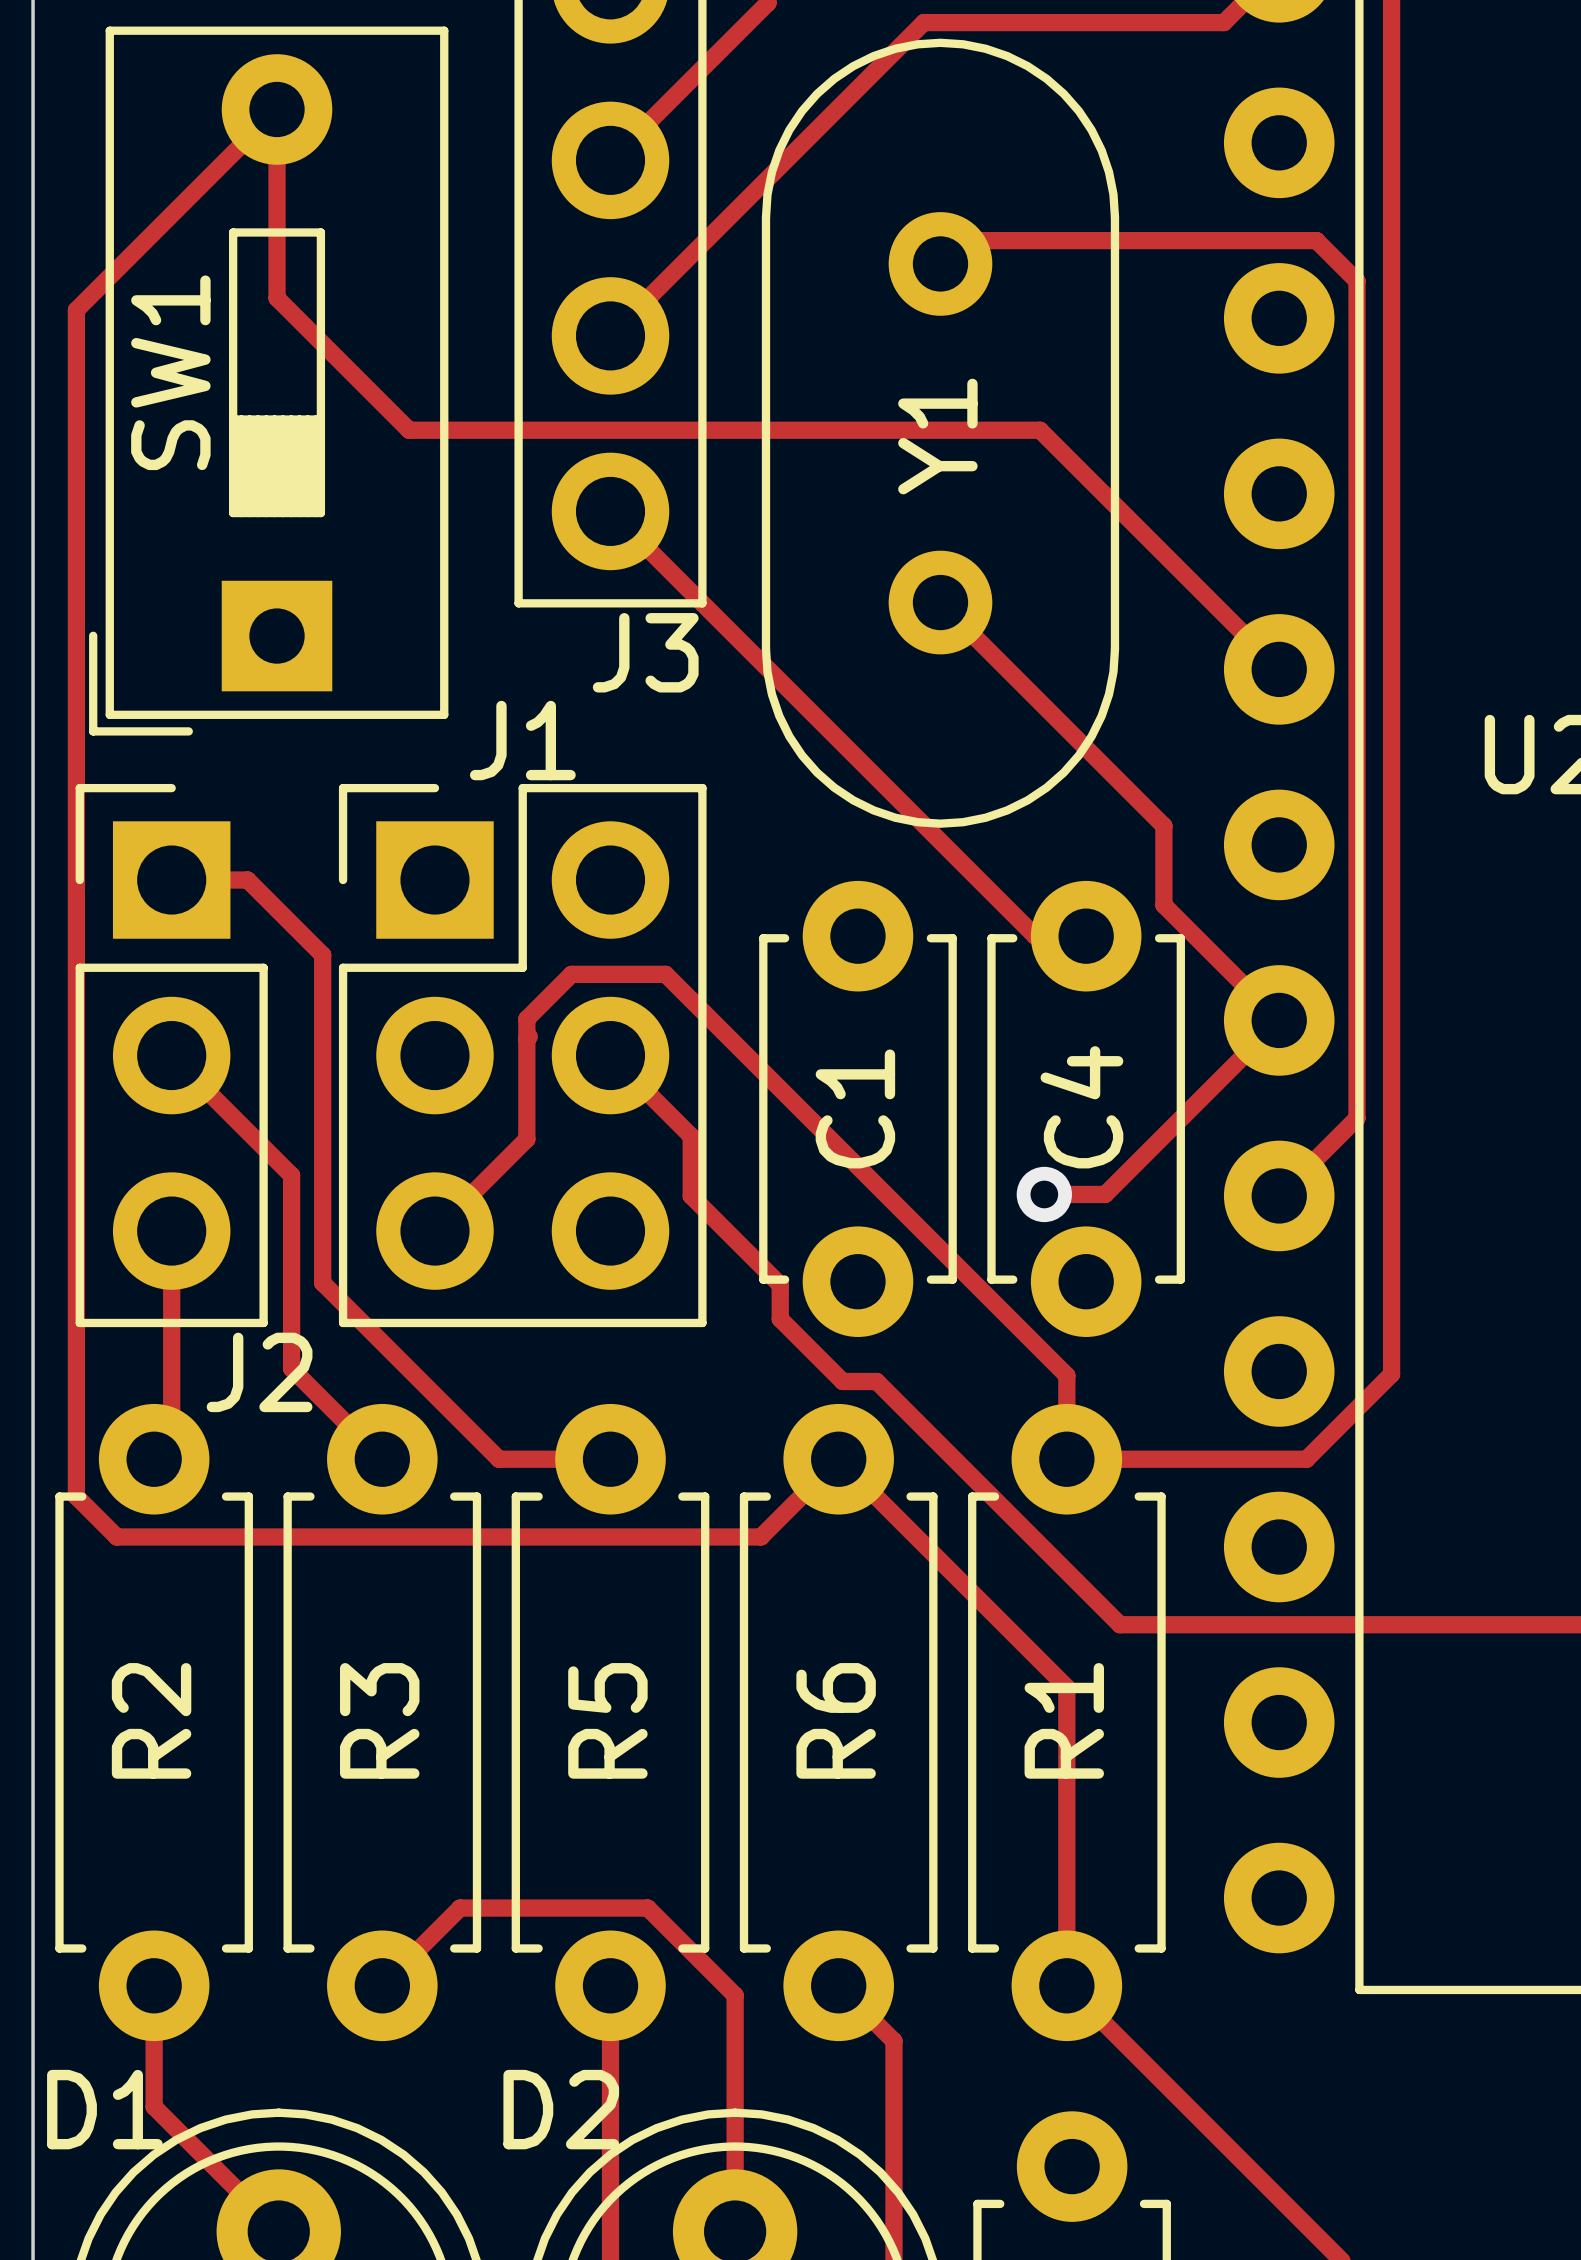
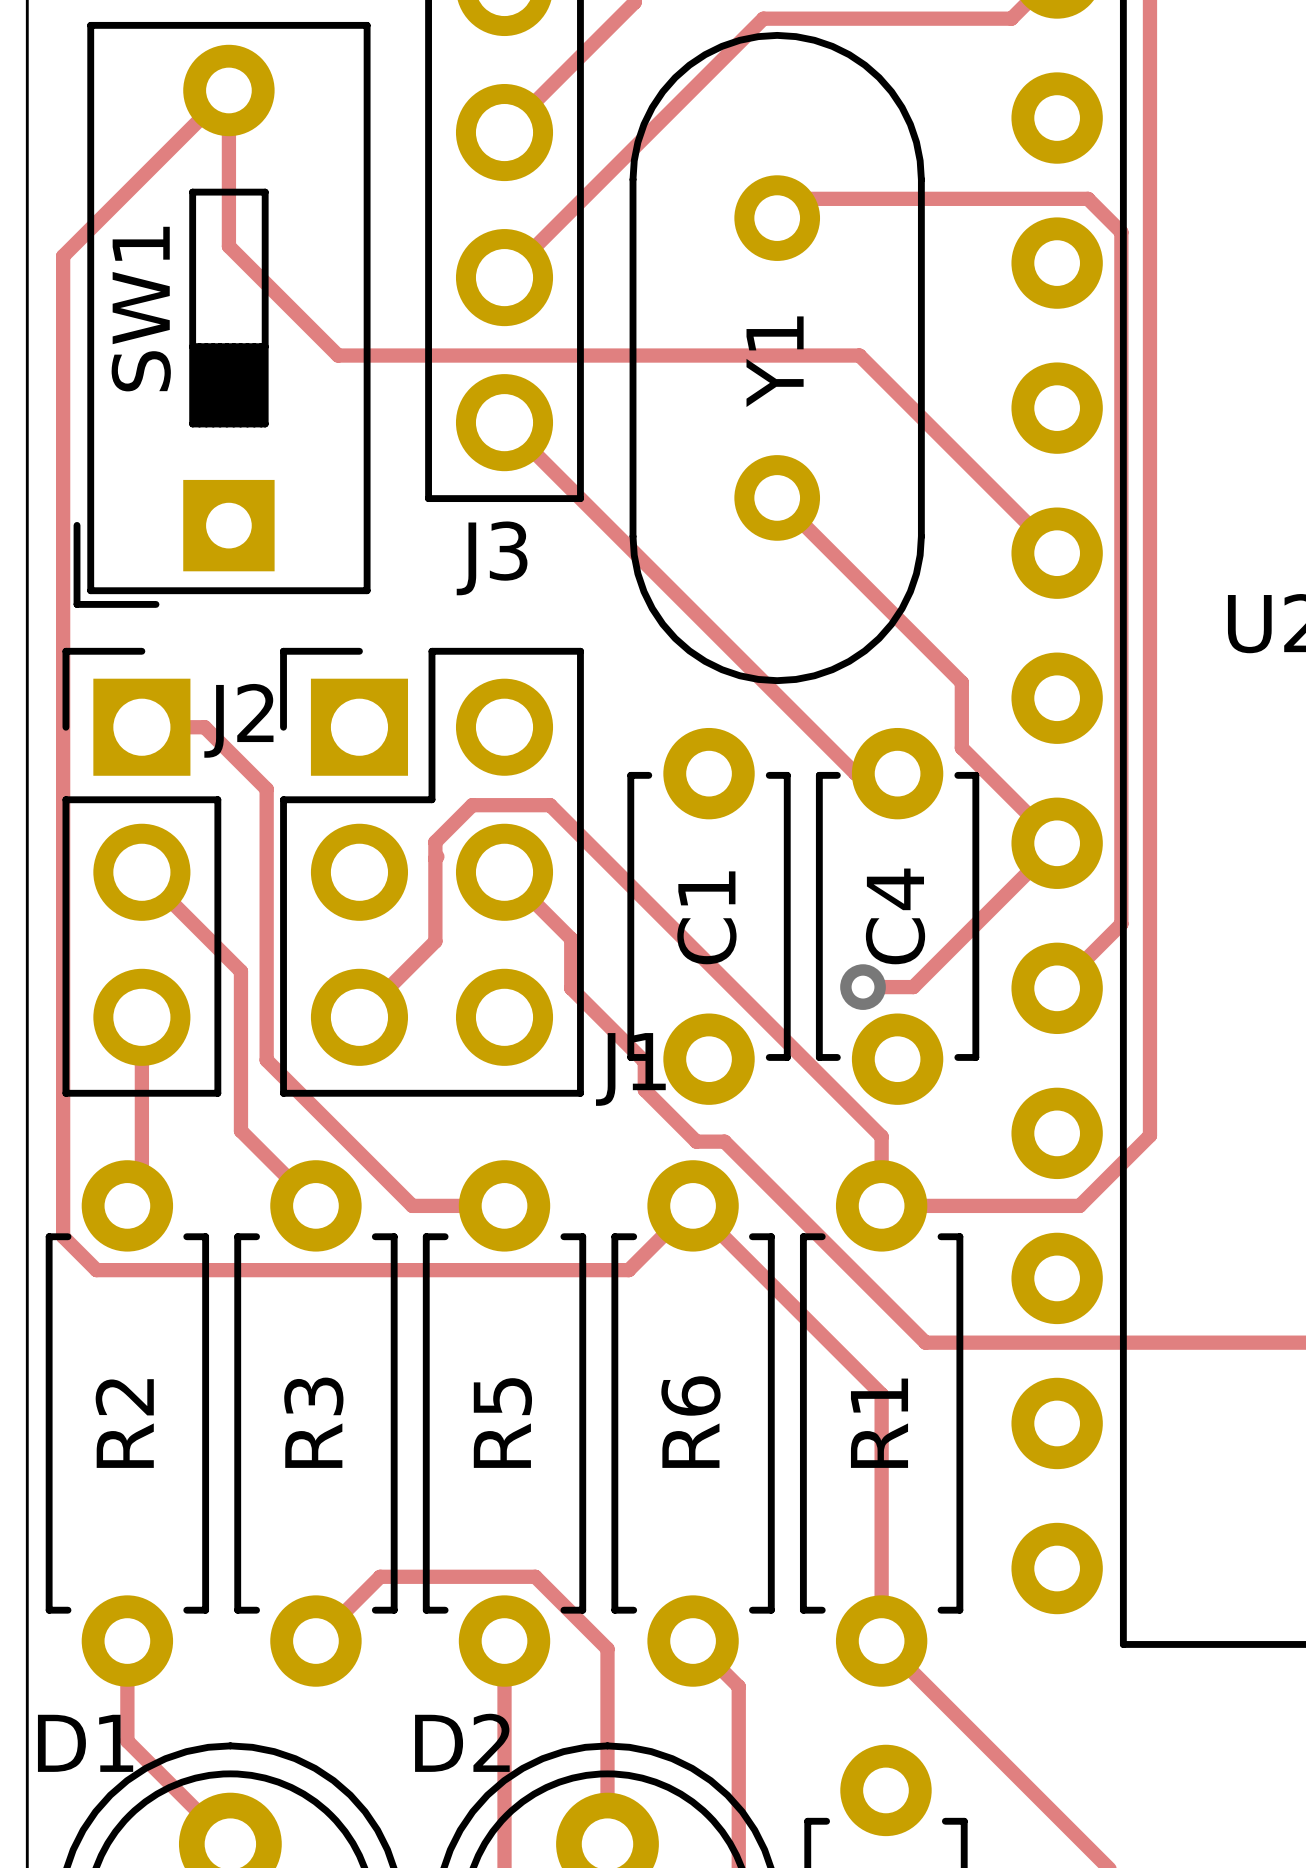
J3 name position: J3 (645, 652) -> J3 (492, 558)
J1 name position: J1 (522, 740) -> J1 (630, 1069)
J2 name position: J2 (259, 1372) -> J2 (238, 720)

